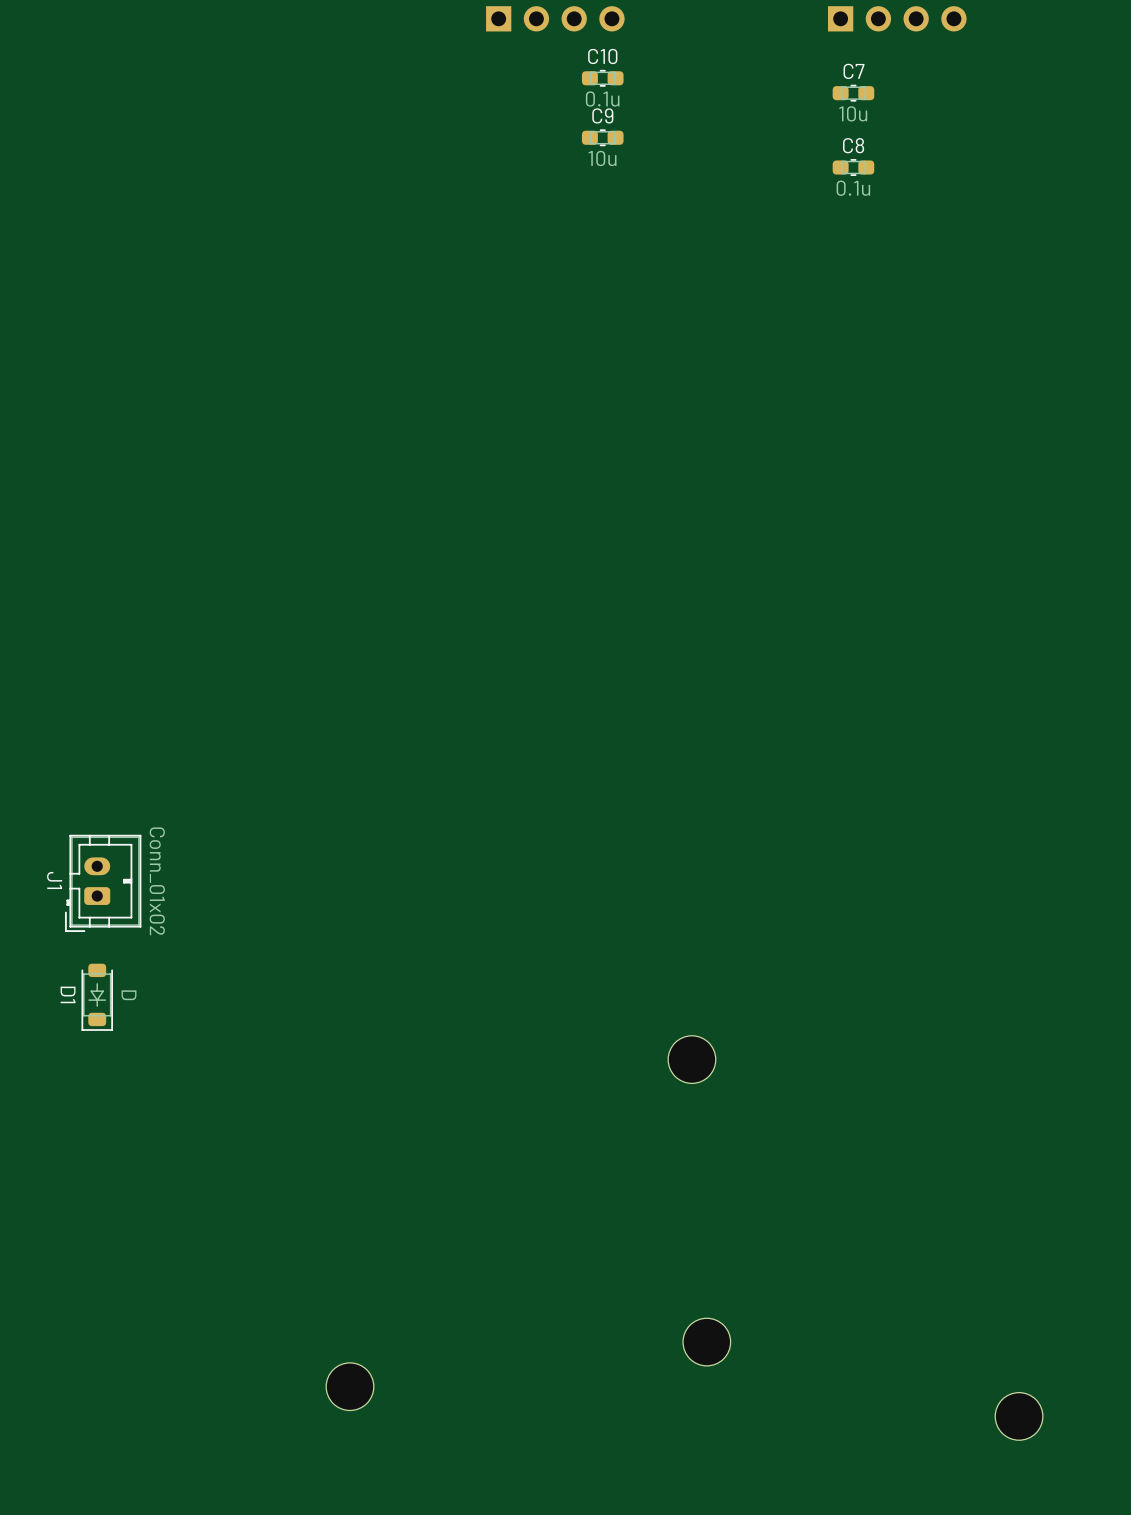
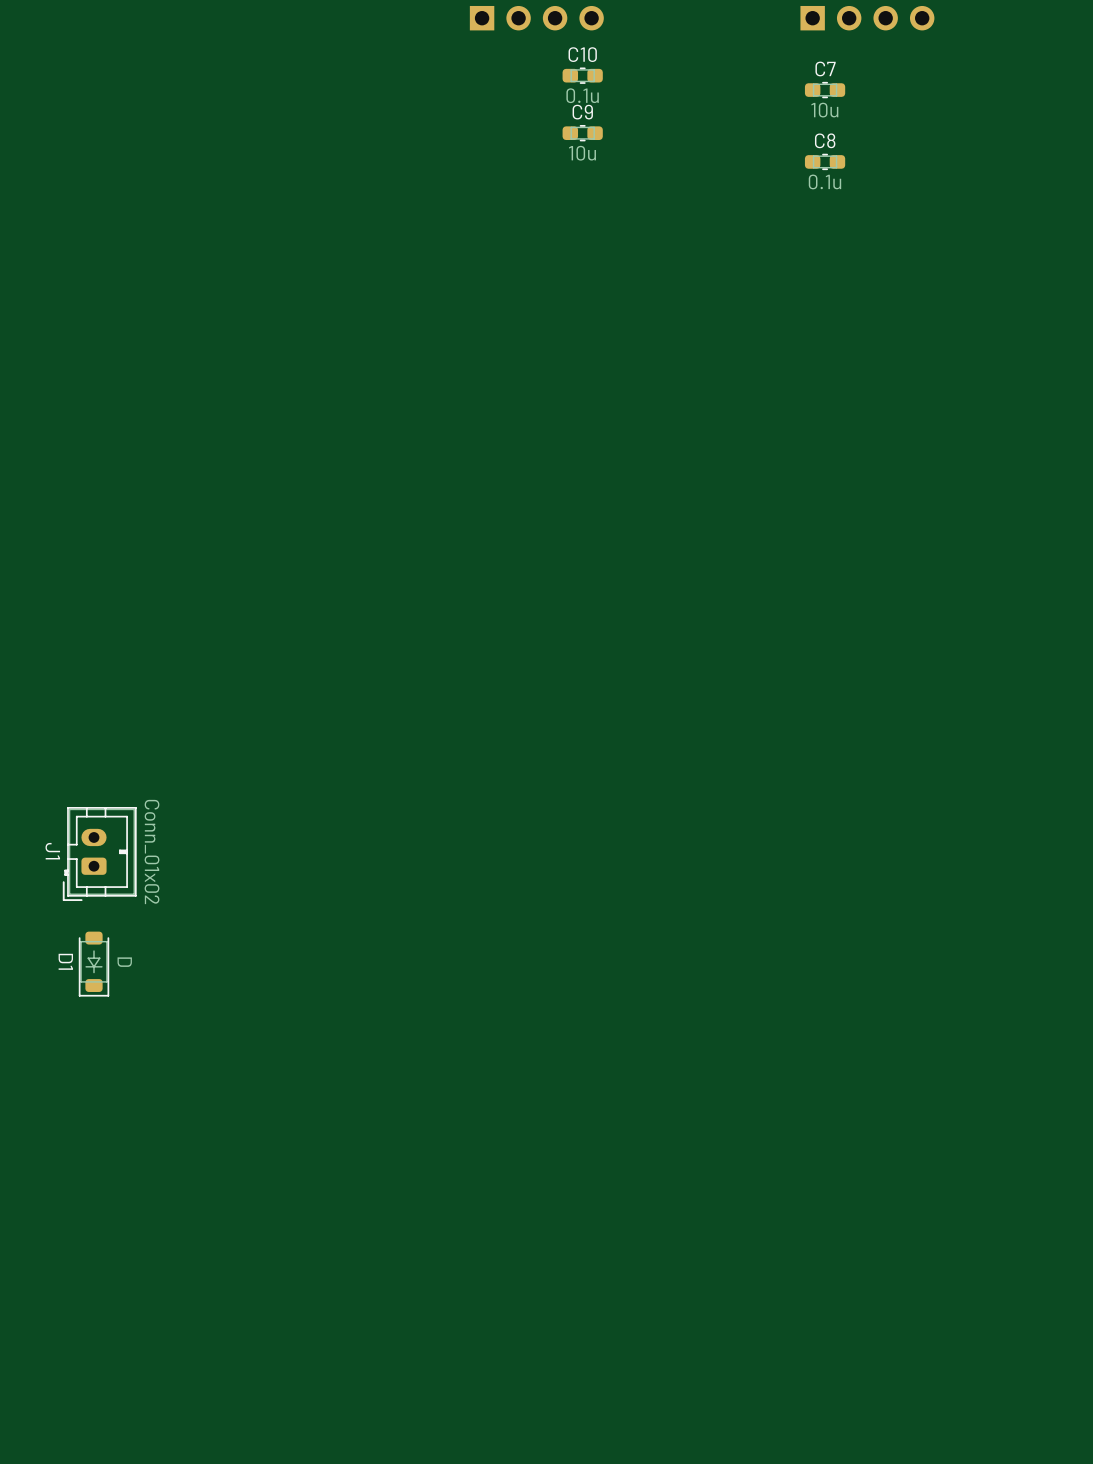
part: (691, 1059) -> none
part: (706, 1342) -> none
part: (349, 1386) -> none
part: (1019, 1416) -> none

